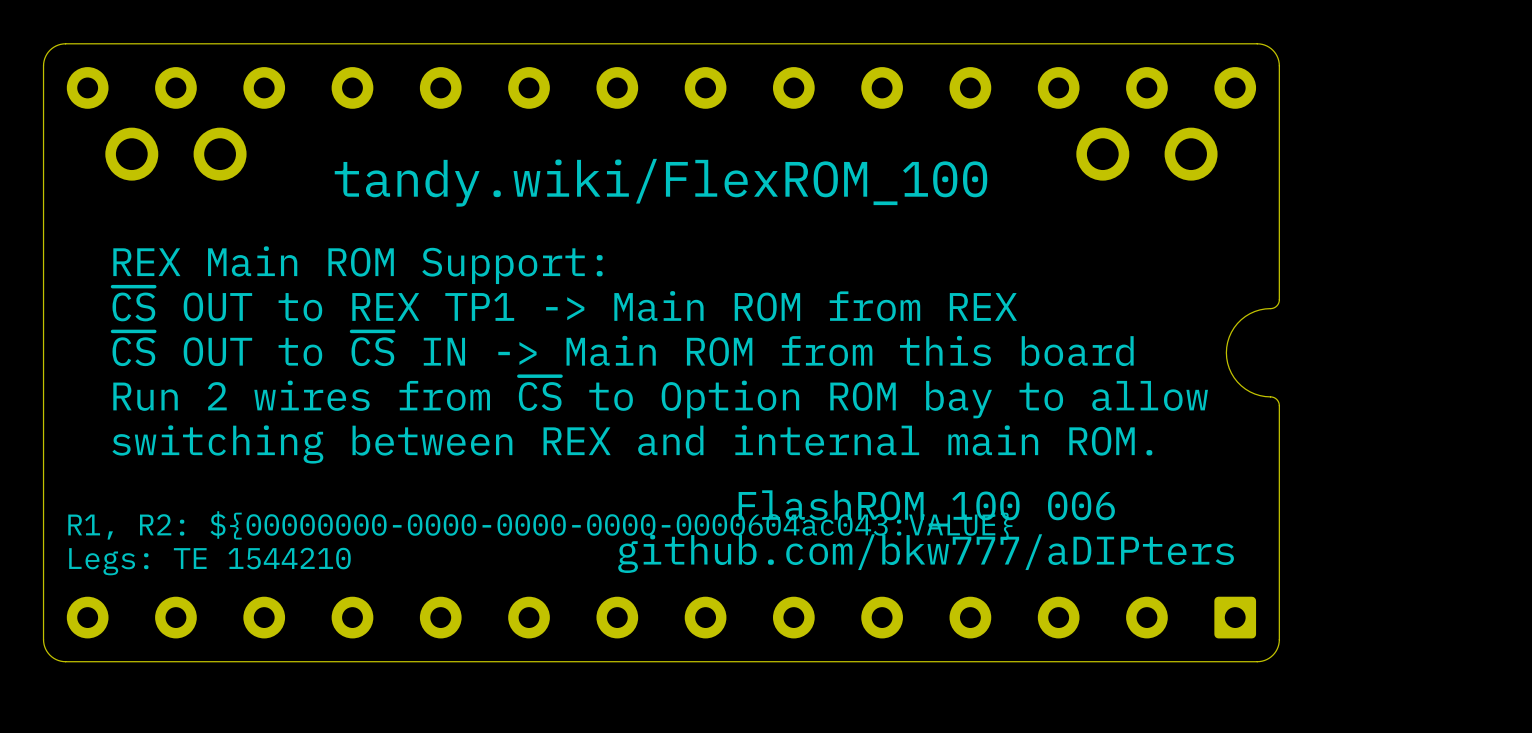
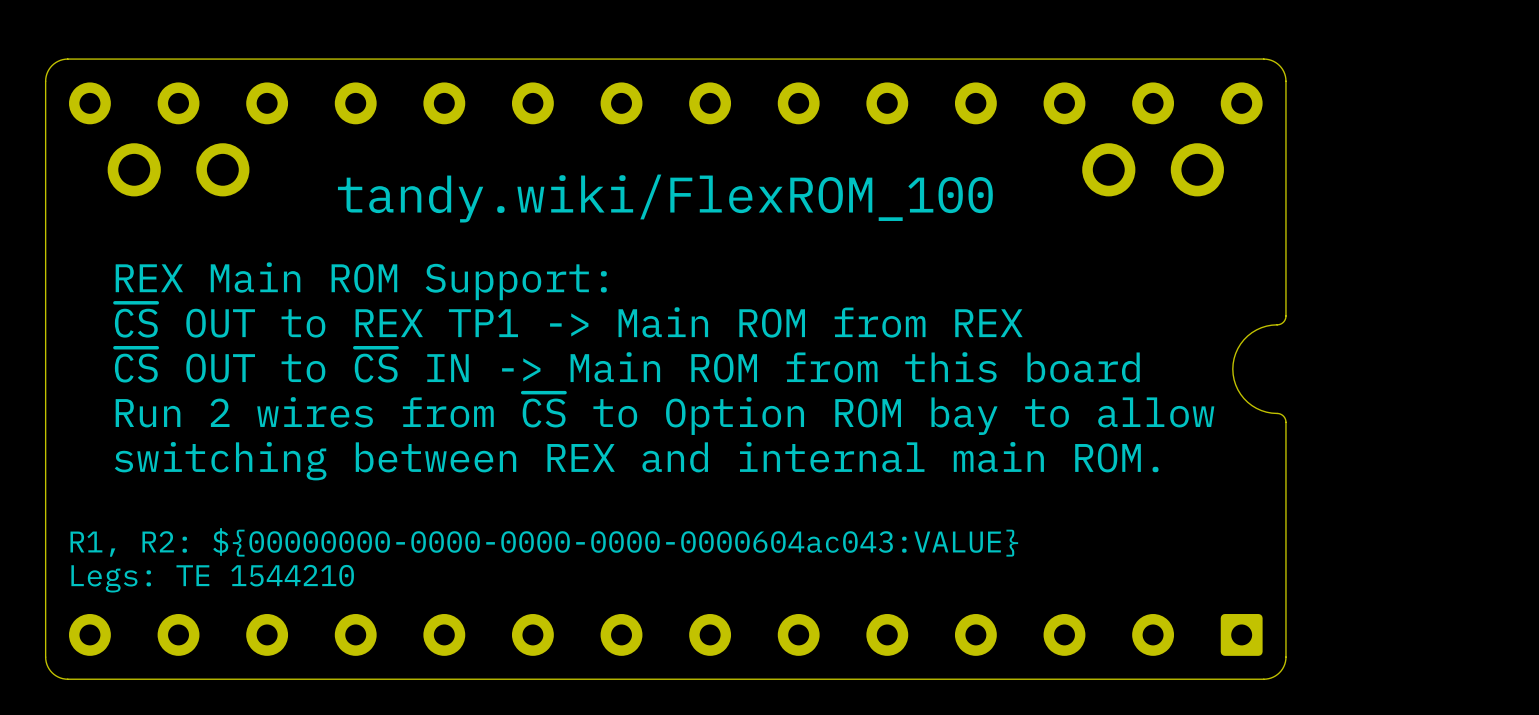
text: FlashROM_100 006 (926, 508) -> none
text: github.com/bkw777/aDIPters (926, 553) -> none

